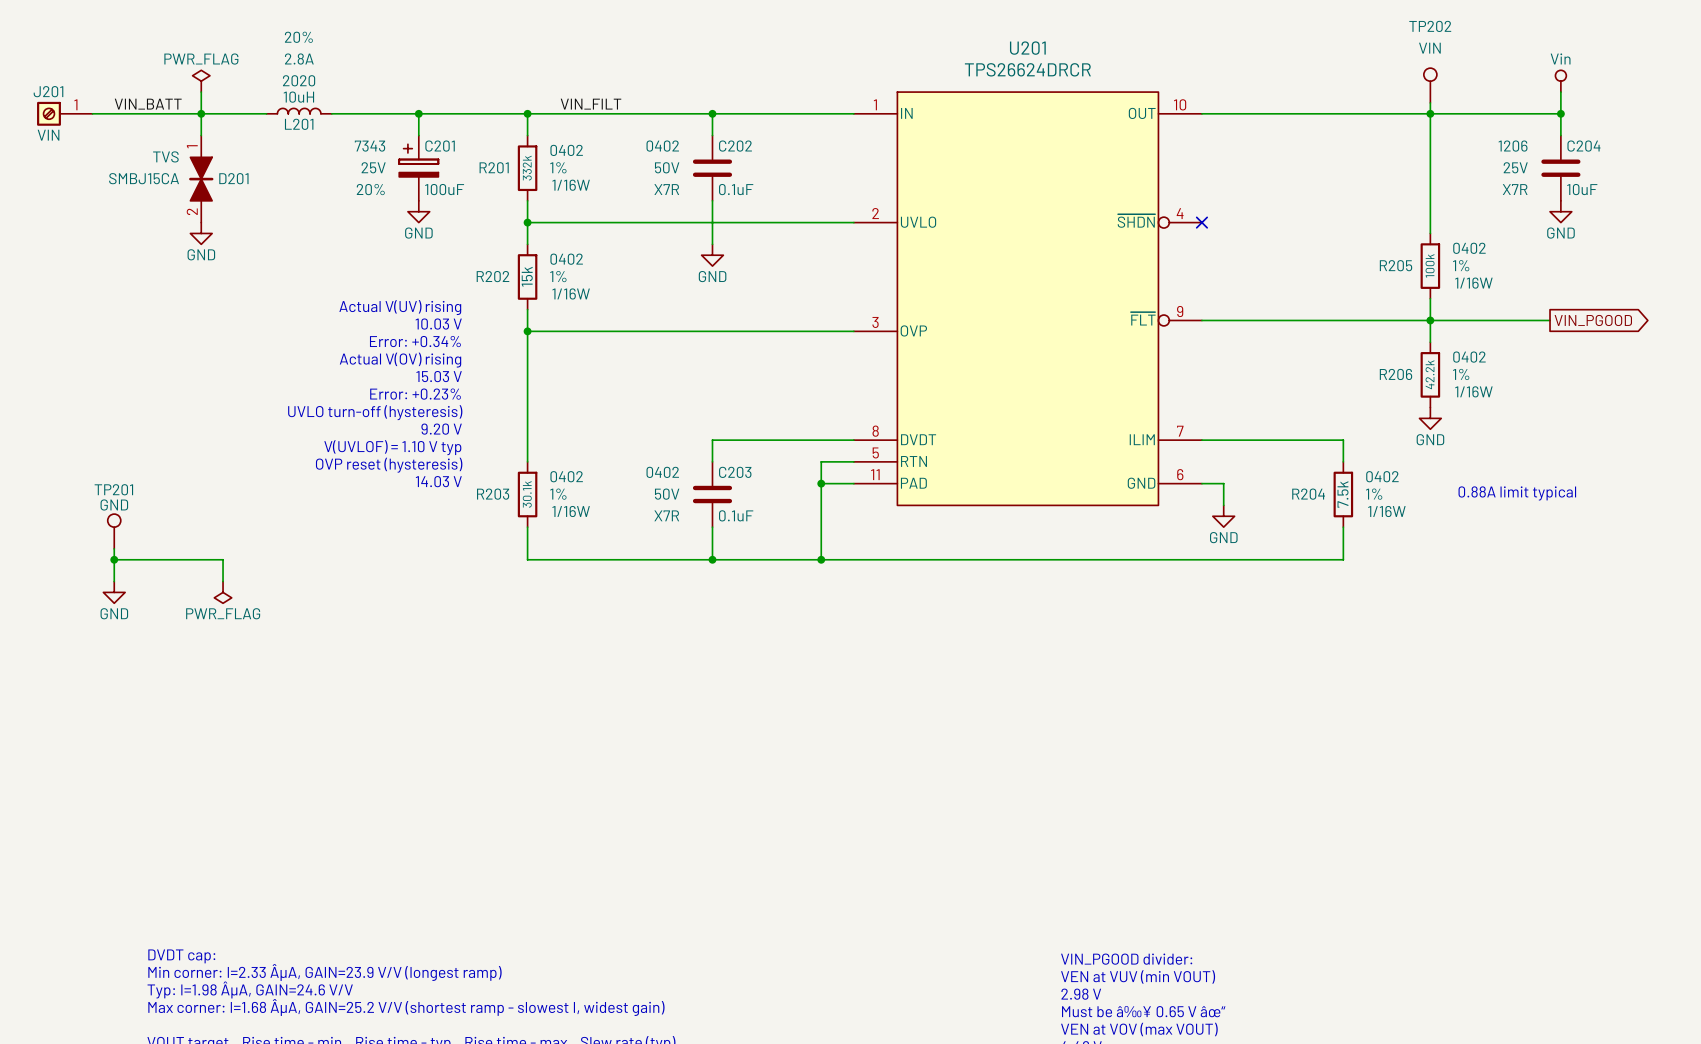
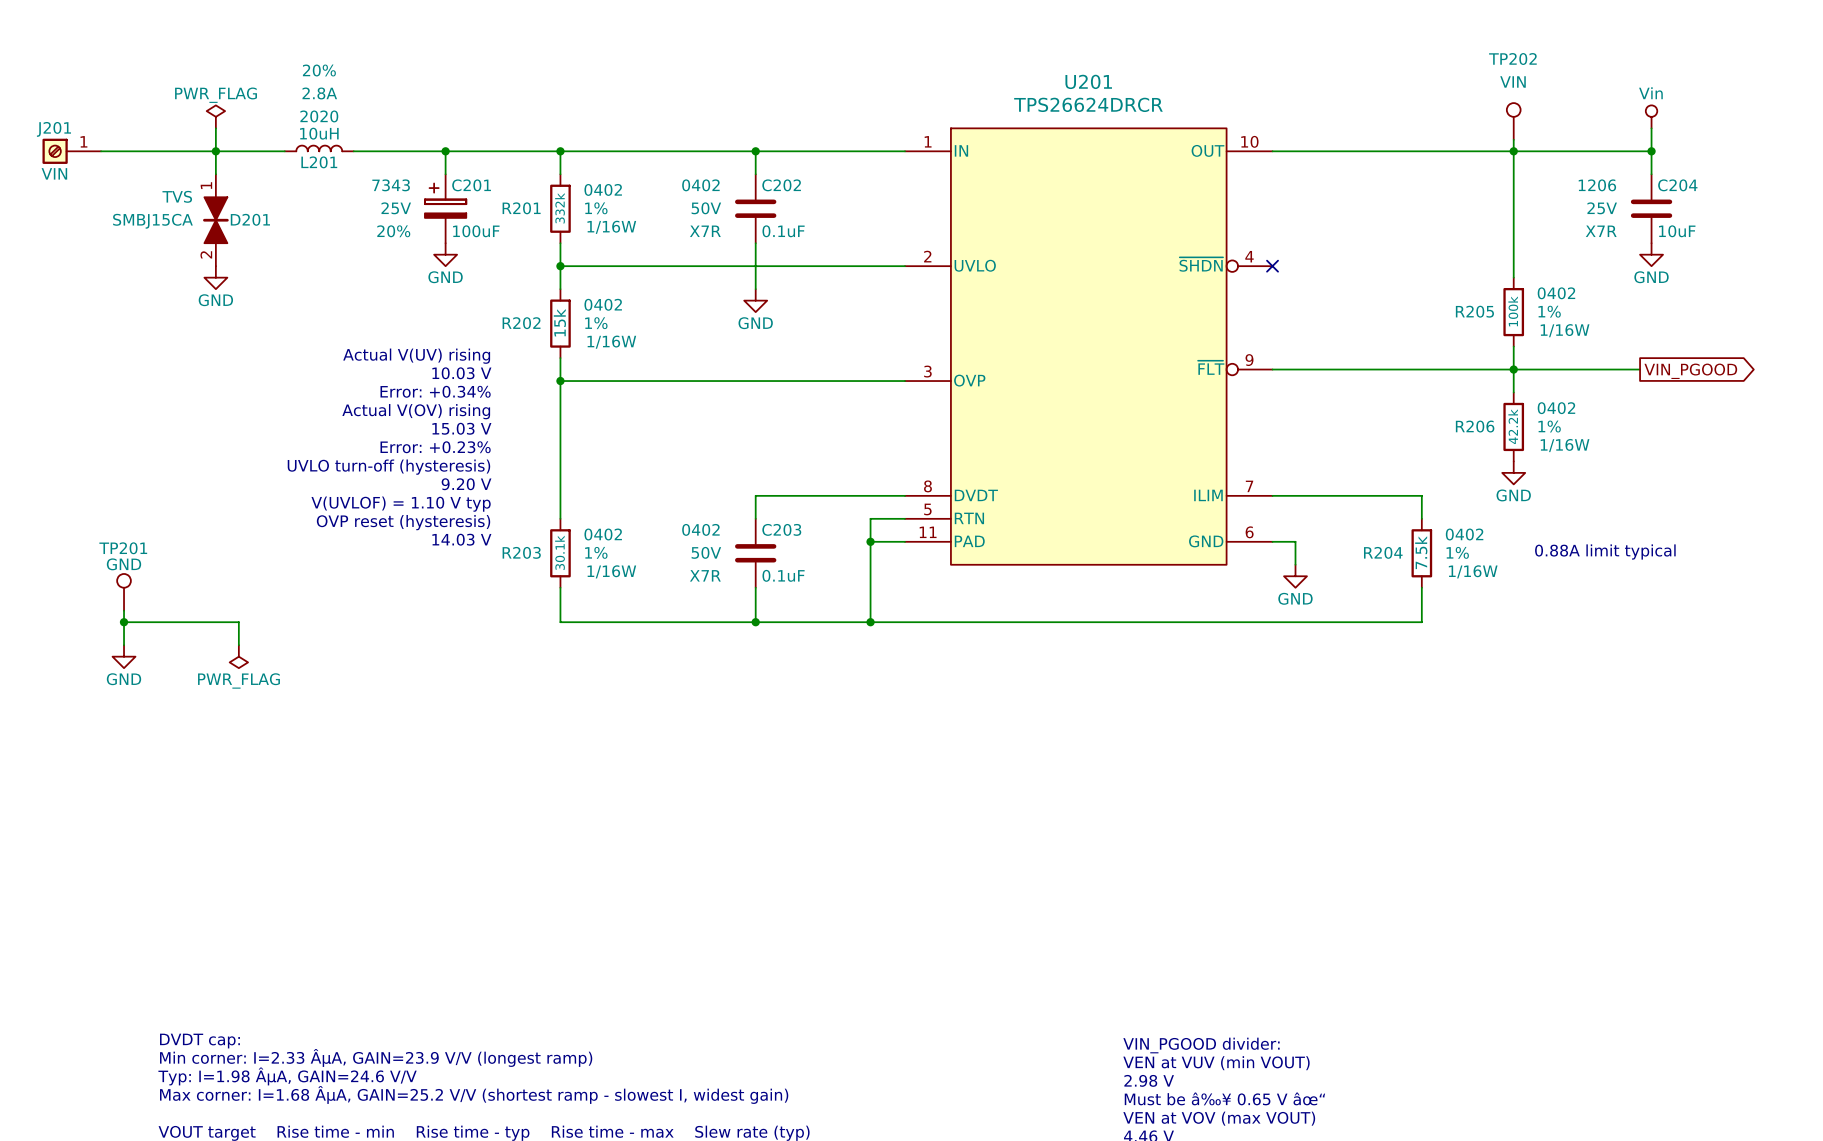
label: VIN_BATT (148, 104) -> none
label: VIN_FILT (591, 104) -> none

